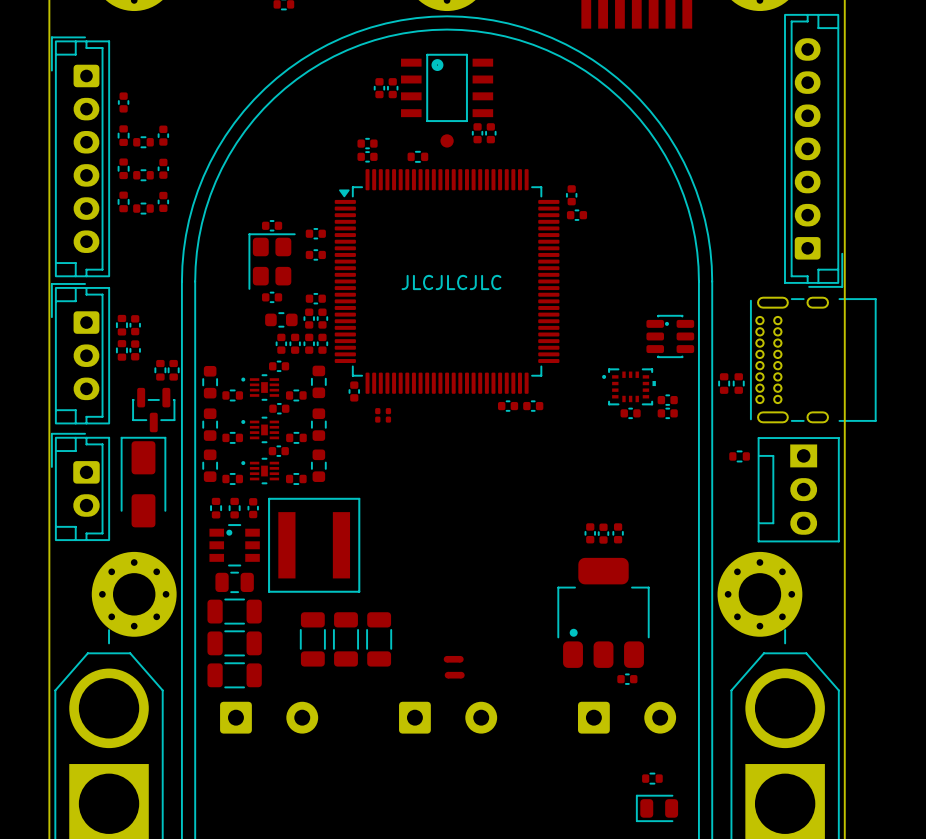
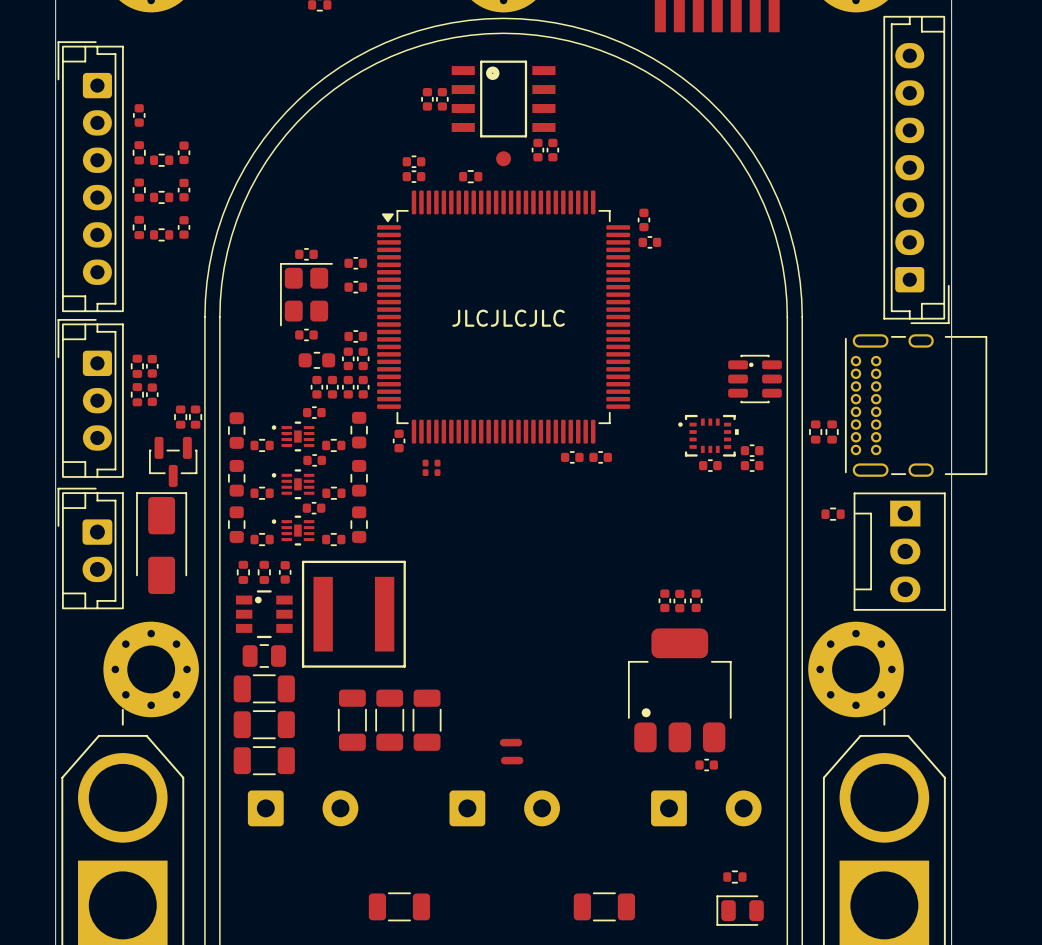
part: none -> (399, 906)
part: none -> (604, 906)

